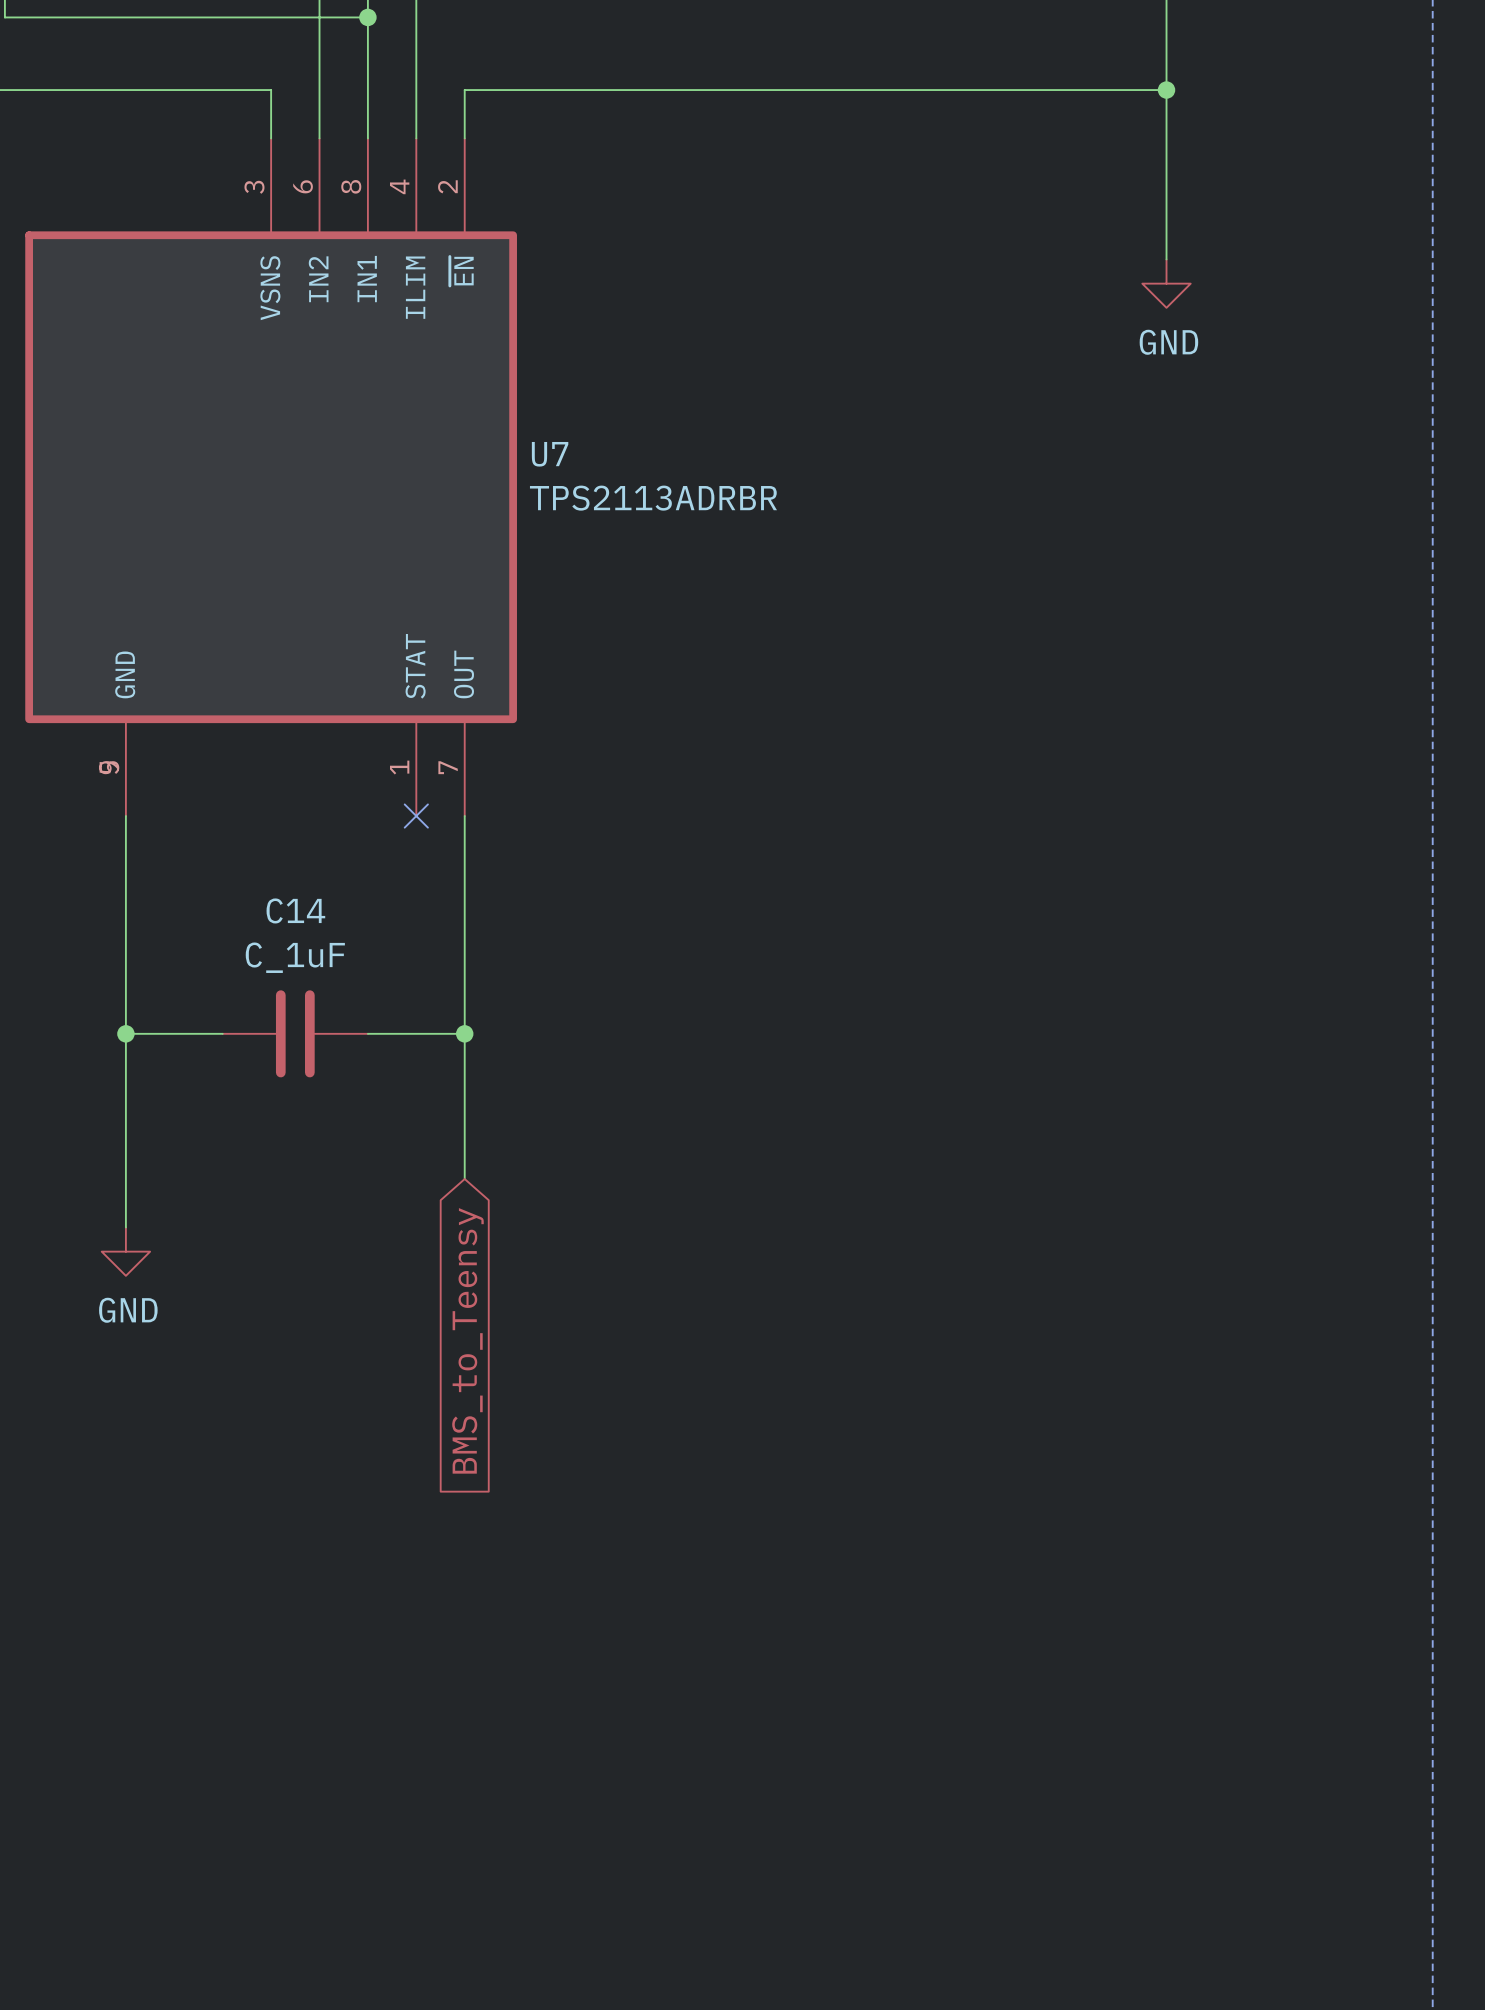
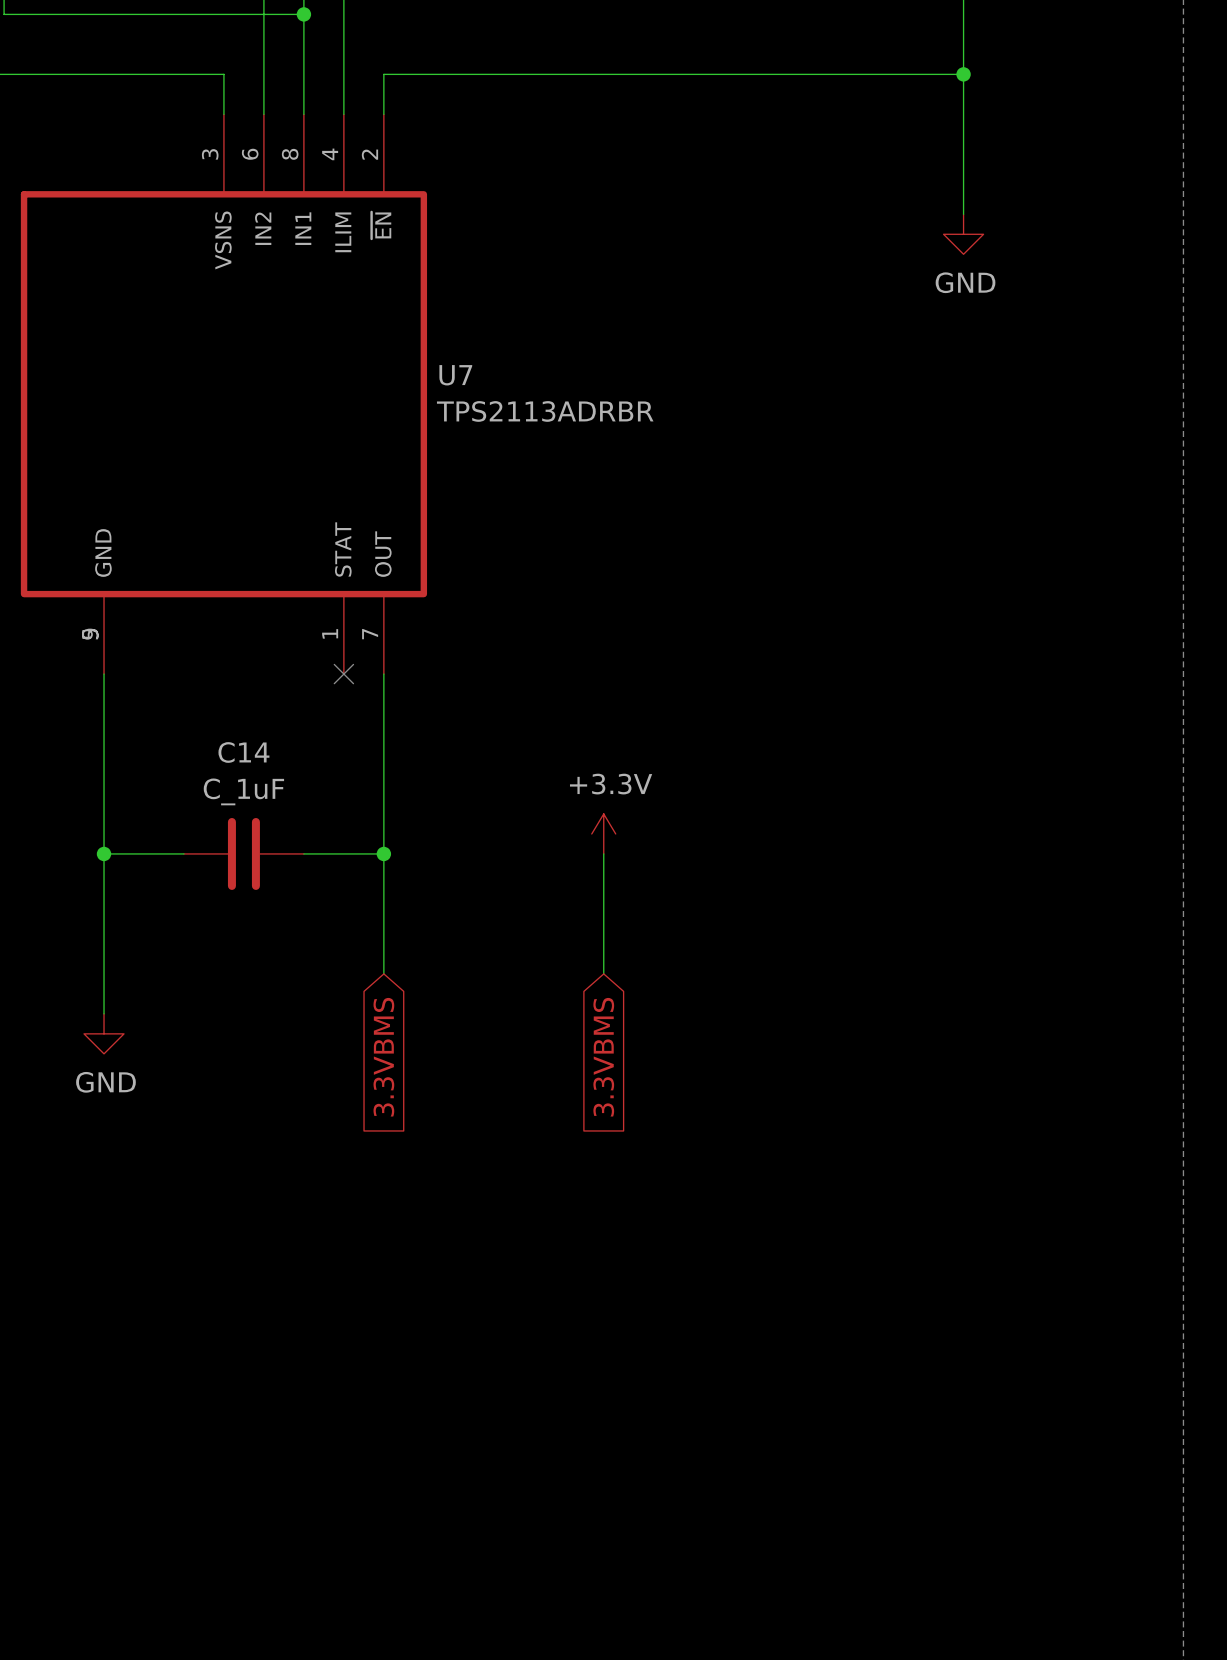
power symbol: none -> +3.3V (603, 833)
wire: none -> (603, 853) (603, 973)
global label: none -> 3.3VBMS (603, 1057)
global label: BMS_to_Teensy (467, 1340) -> 3.3VBMS (383, 1057)

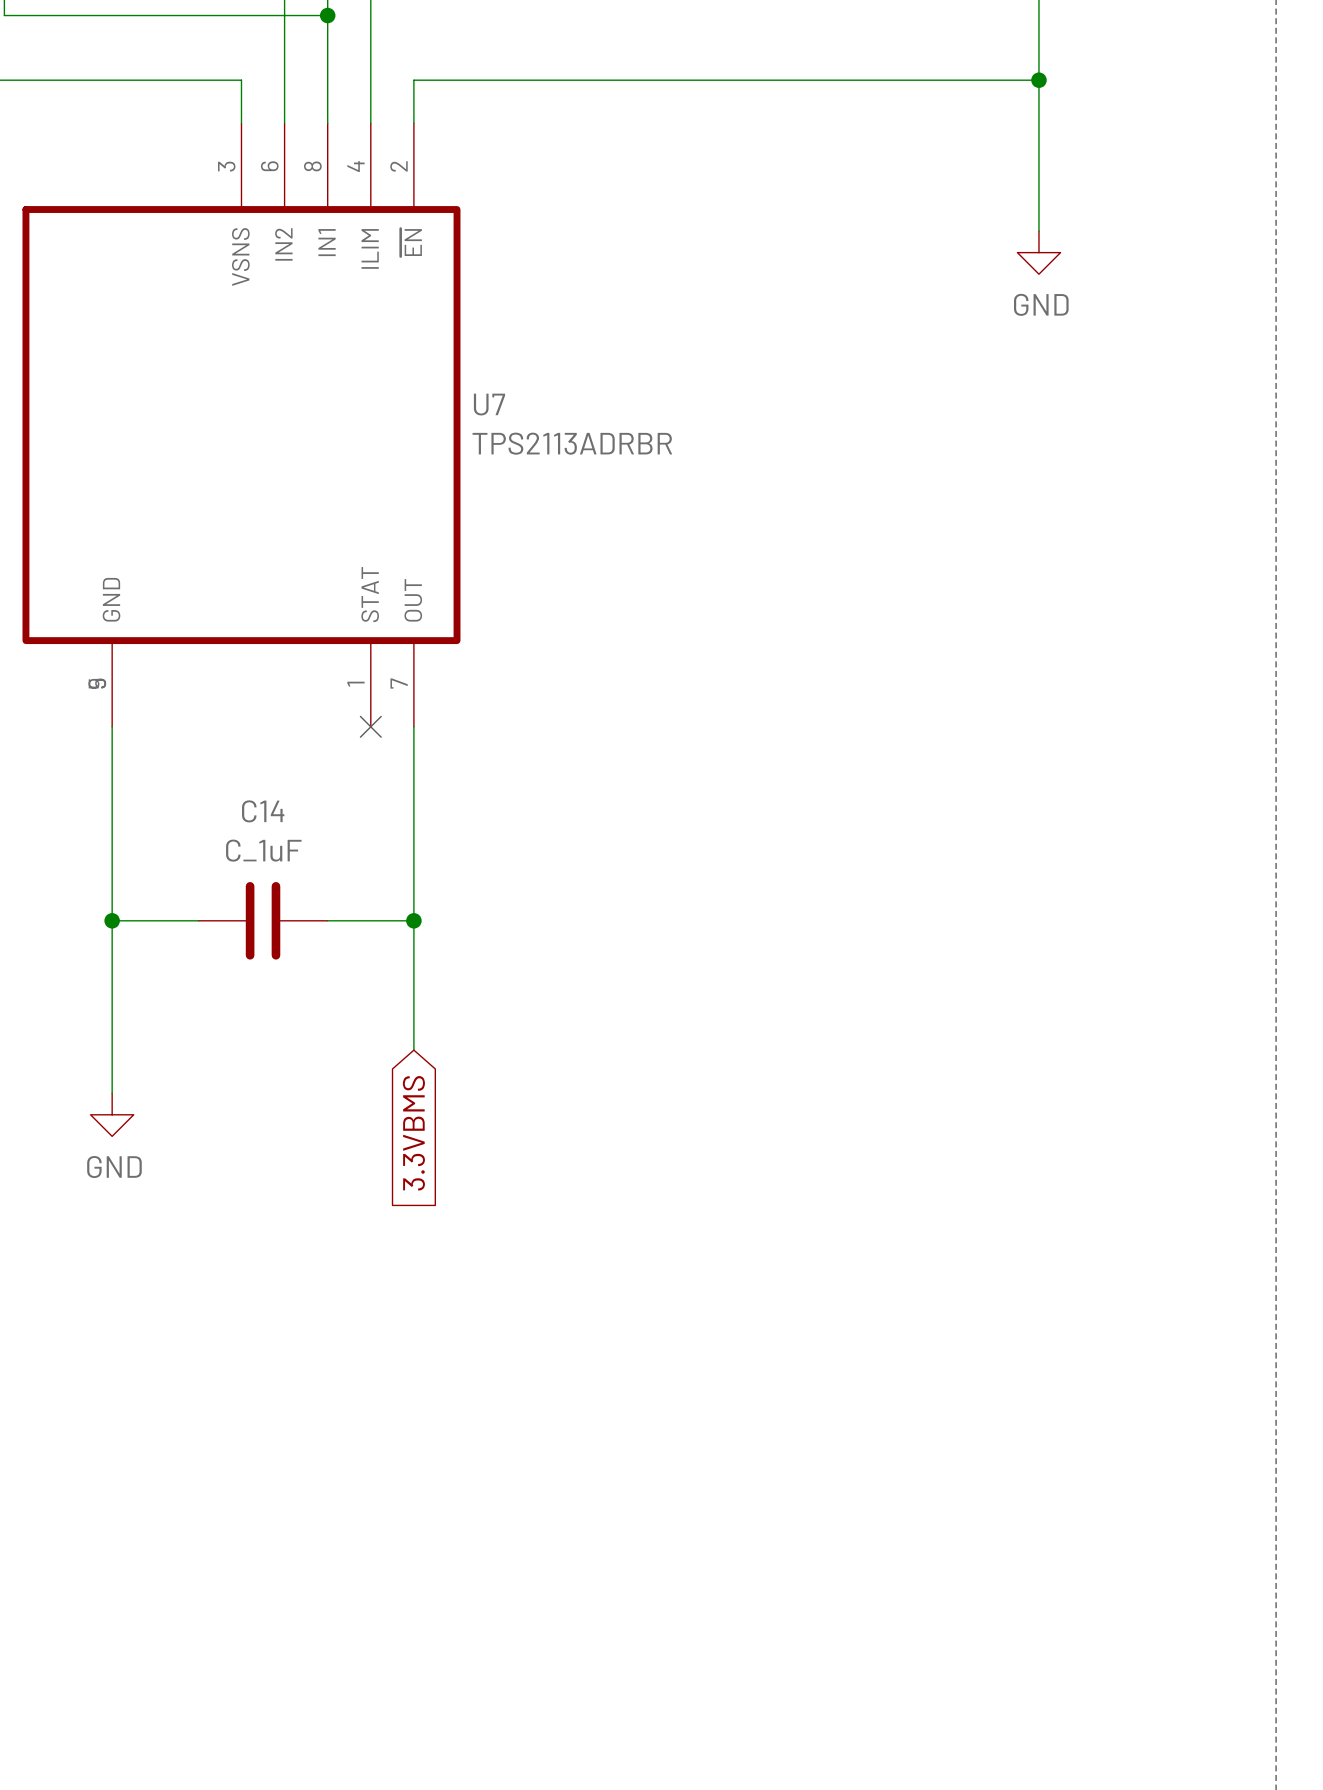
power symbol: +3.3V (603, 833) -> none
wire: (603, 853) (603, 973) -> none
global label: 3.3VBMS (603, 1057) -> none

